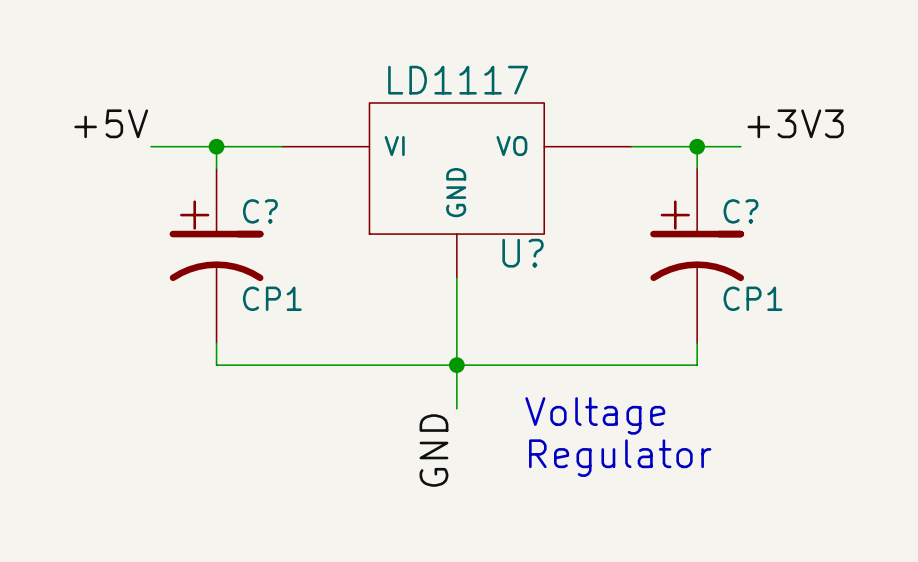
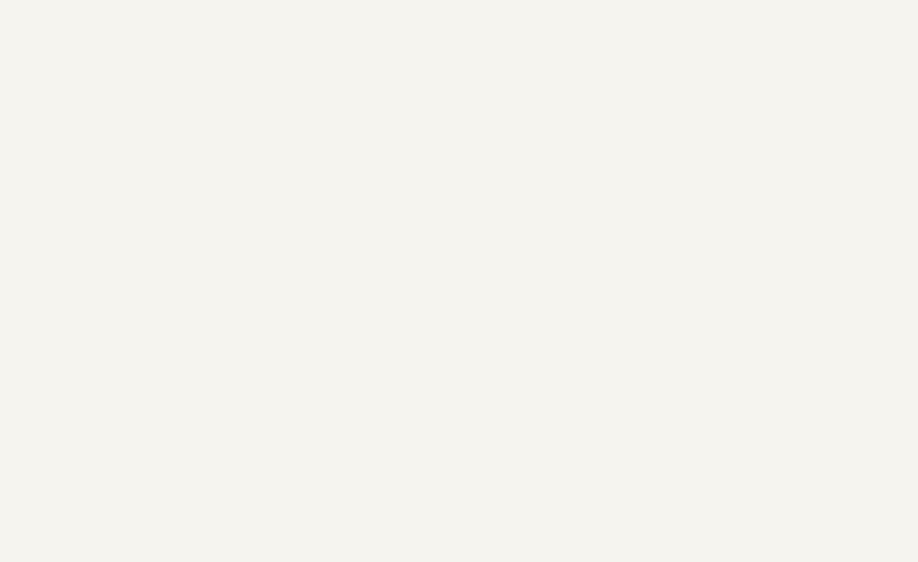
label: +5V (111, 123) -> none
label: +3V3 (795, 123) -> none
wire: (151, 146) (282, 146) -> none
wire: (216, 146) (216, 168) -> none
junction: (216, 146) -> none
wire: (631, 146) (740, 146) -> none
wire: (697, 146) (697, 168) -> none
junction: (697, 146) -> none
U?: LD1117 (456, 190) -> none
C?: CP1 (216, 255) -> none
C?: CP1 (697, 255) -> none
wire: (456, 277) (456, 408) -> none
wire: (216, 343) (216, 365) (697, 365) (697, 343) -> none
junction: (456, 365) -> none
text: Voltage (595, 415) -> none
label: GND (433, 450) -> none
text: Regulator (620, 458) -> none

